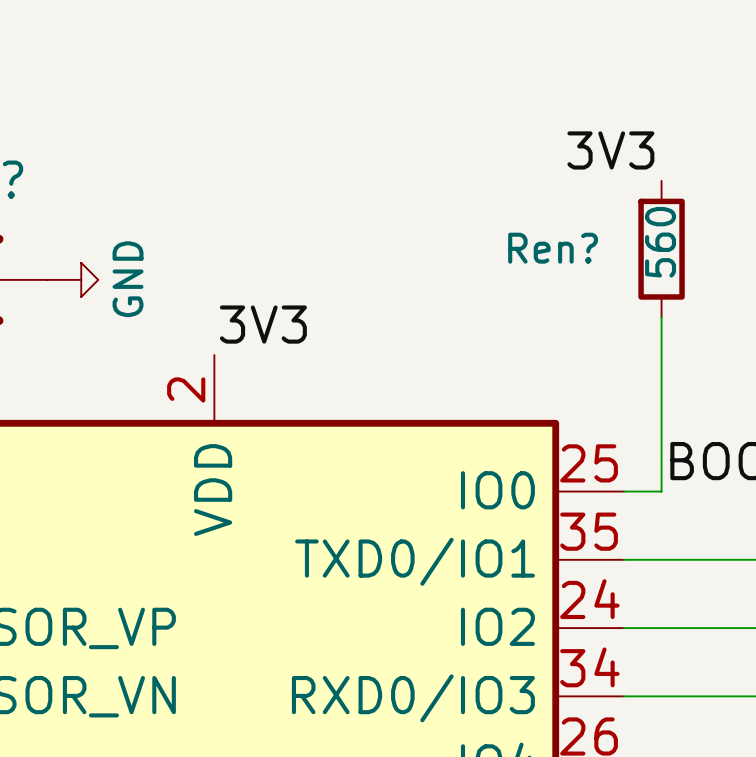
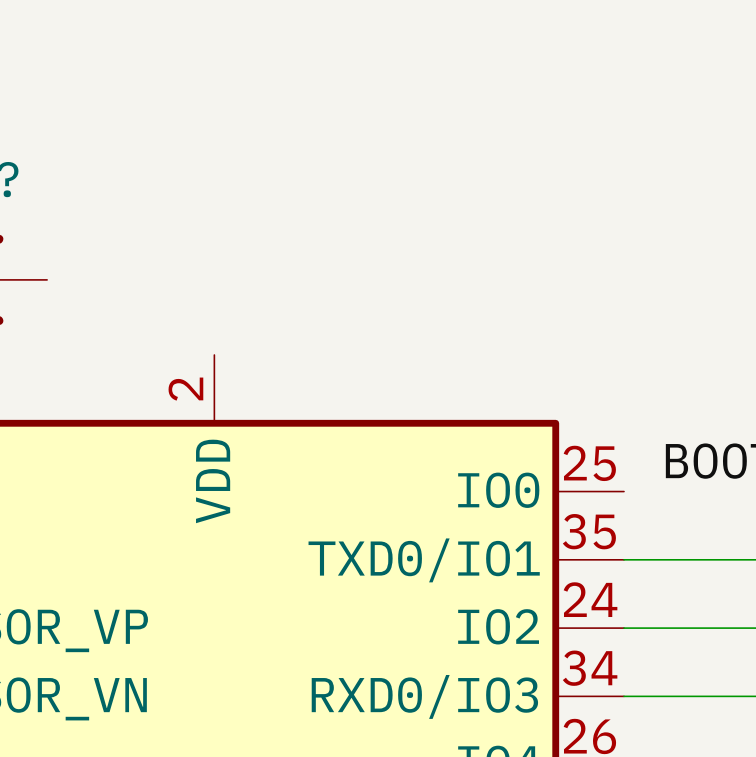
label: 3V3 (610, 150) -> none
Ren?: 560 (661, 249) -> none
power symbol: GND (72, 279) -> none
wire: (661, 317) (661, 491) (624, 491) -> none
label: 3V3 (263, 324) -> none

